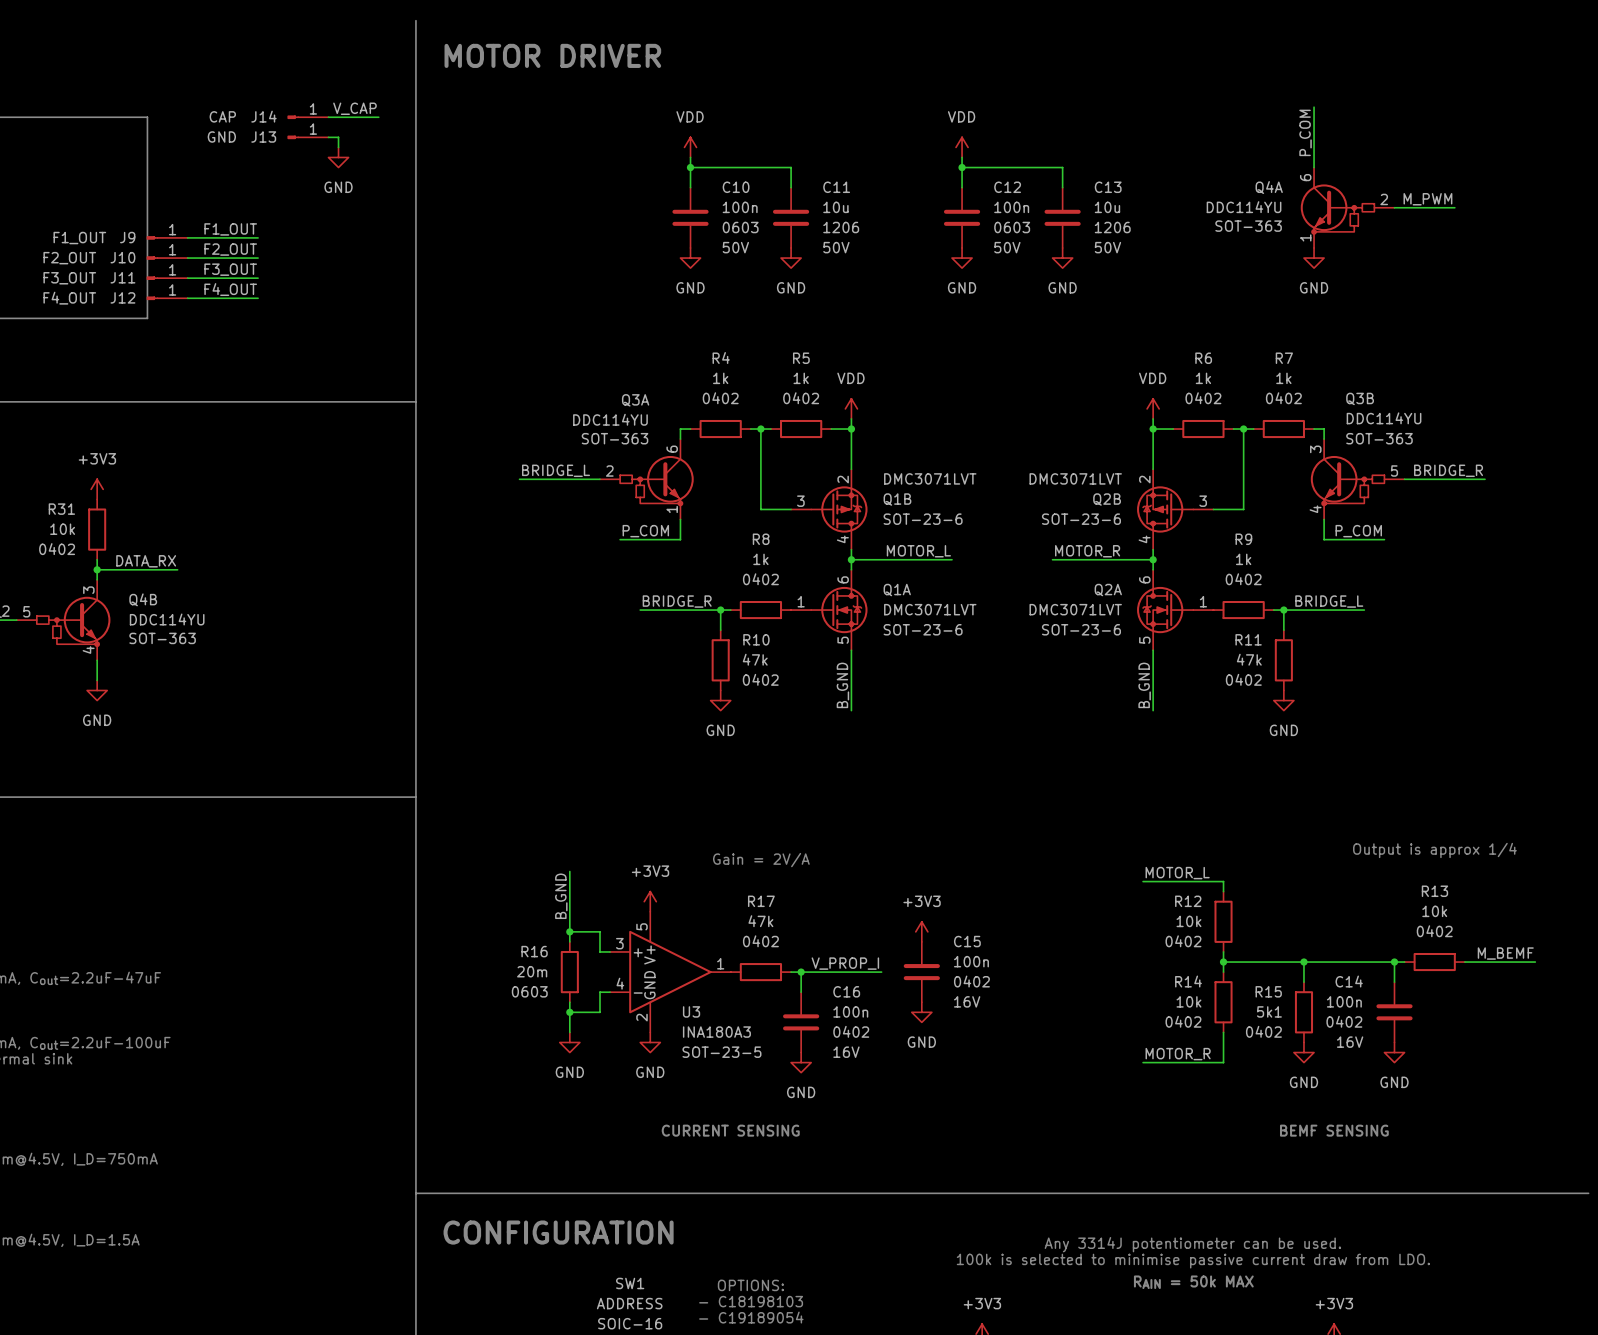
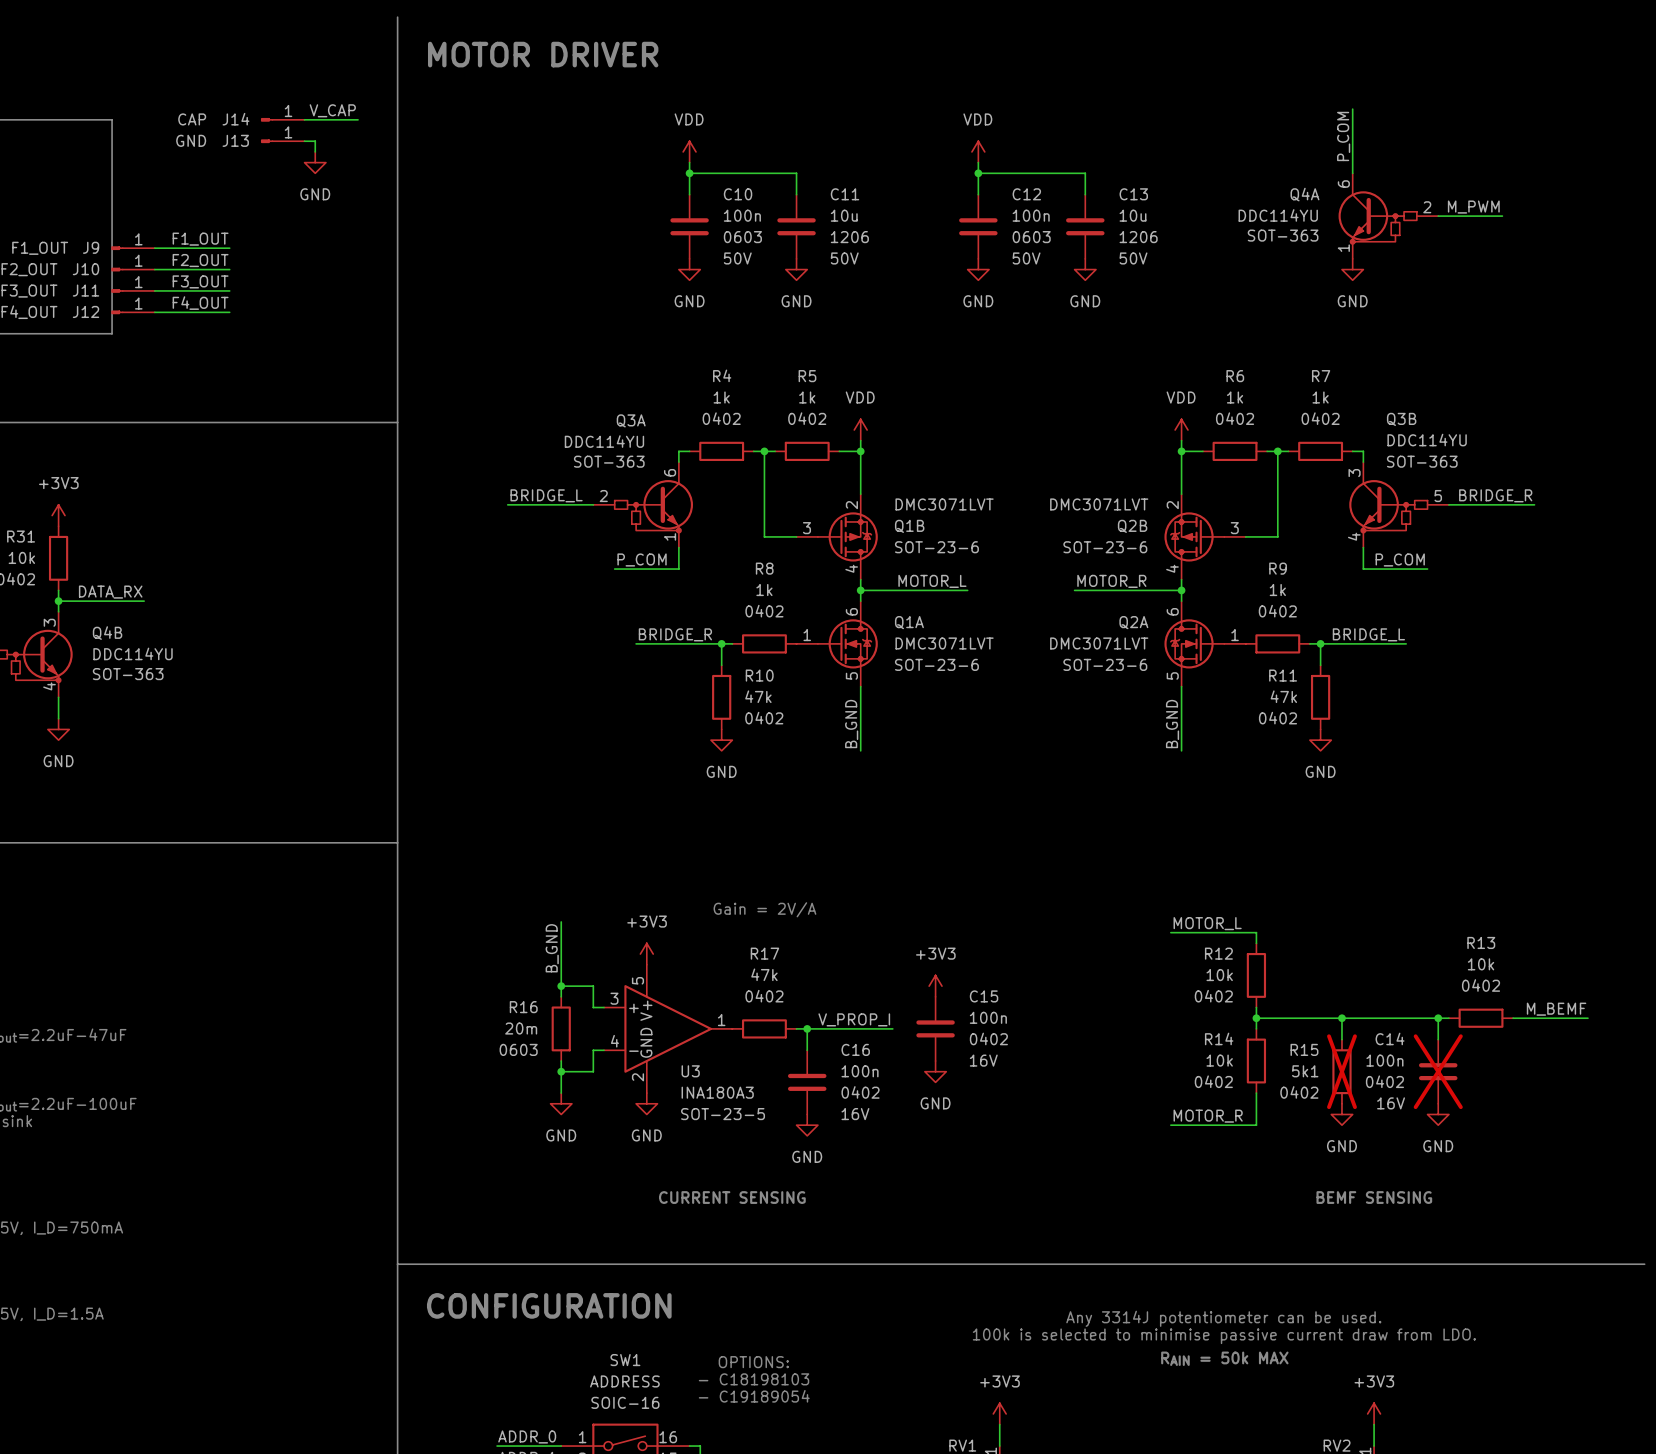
text: Output is approx 1/4 (1434, 850) -> none
R15 do-not-place cross: none -> (1341, 1071)
C14 do-not-place cross: none -> (1438, 1071)

